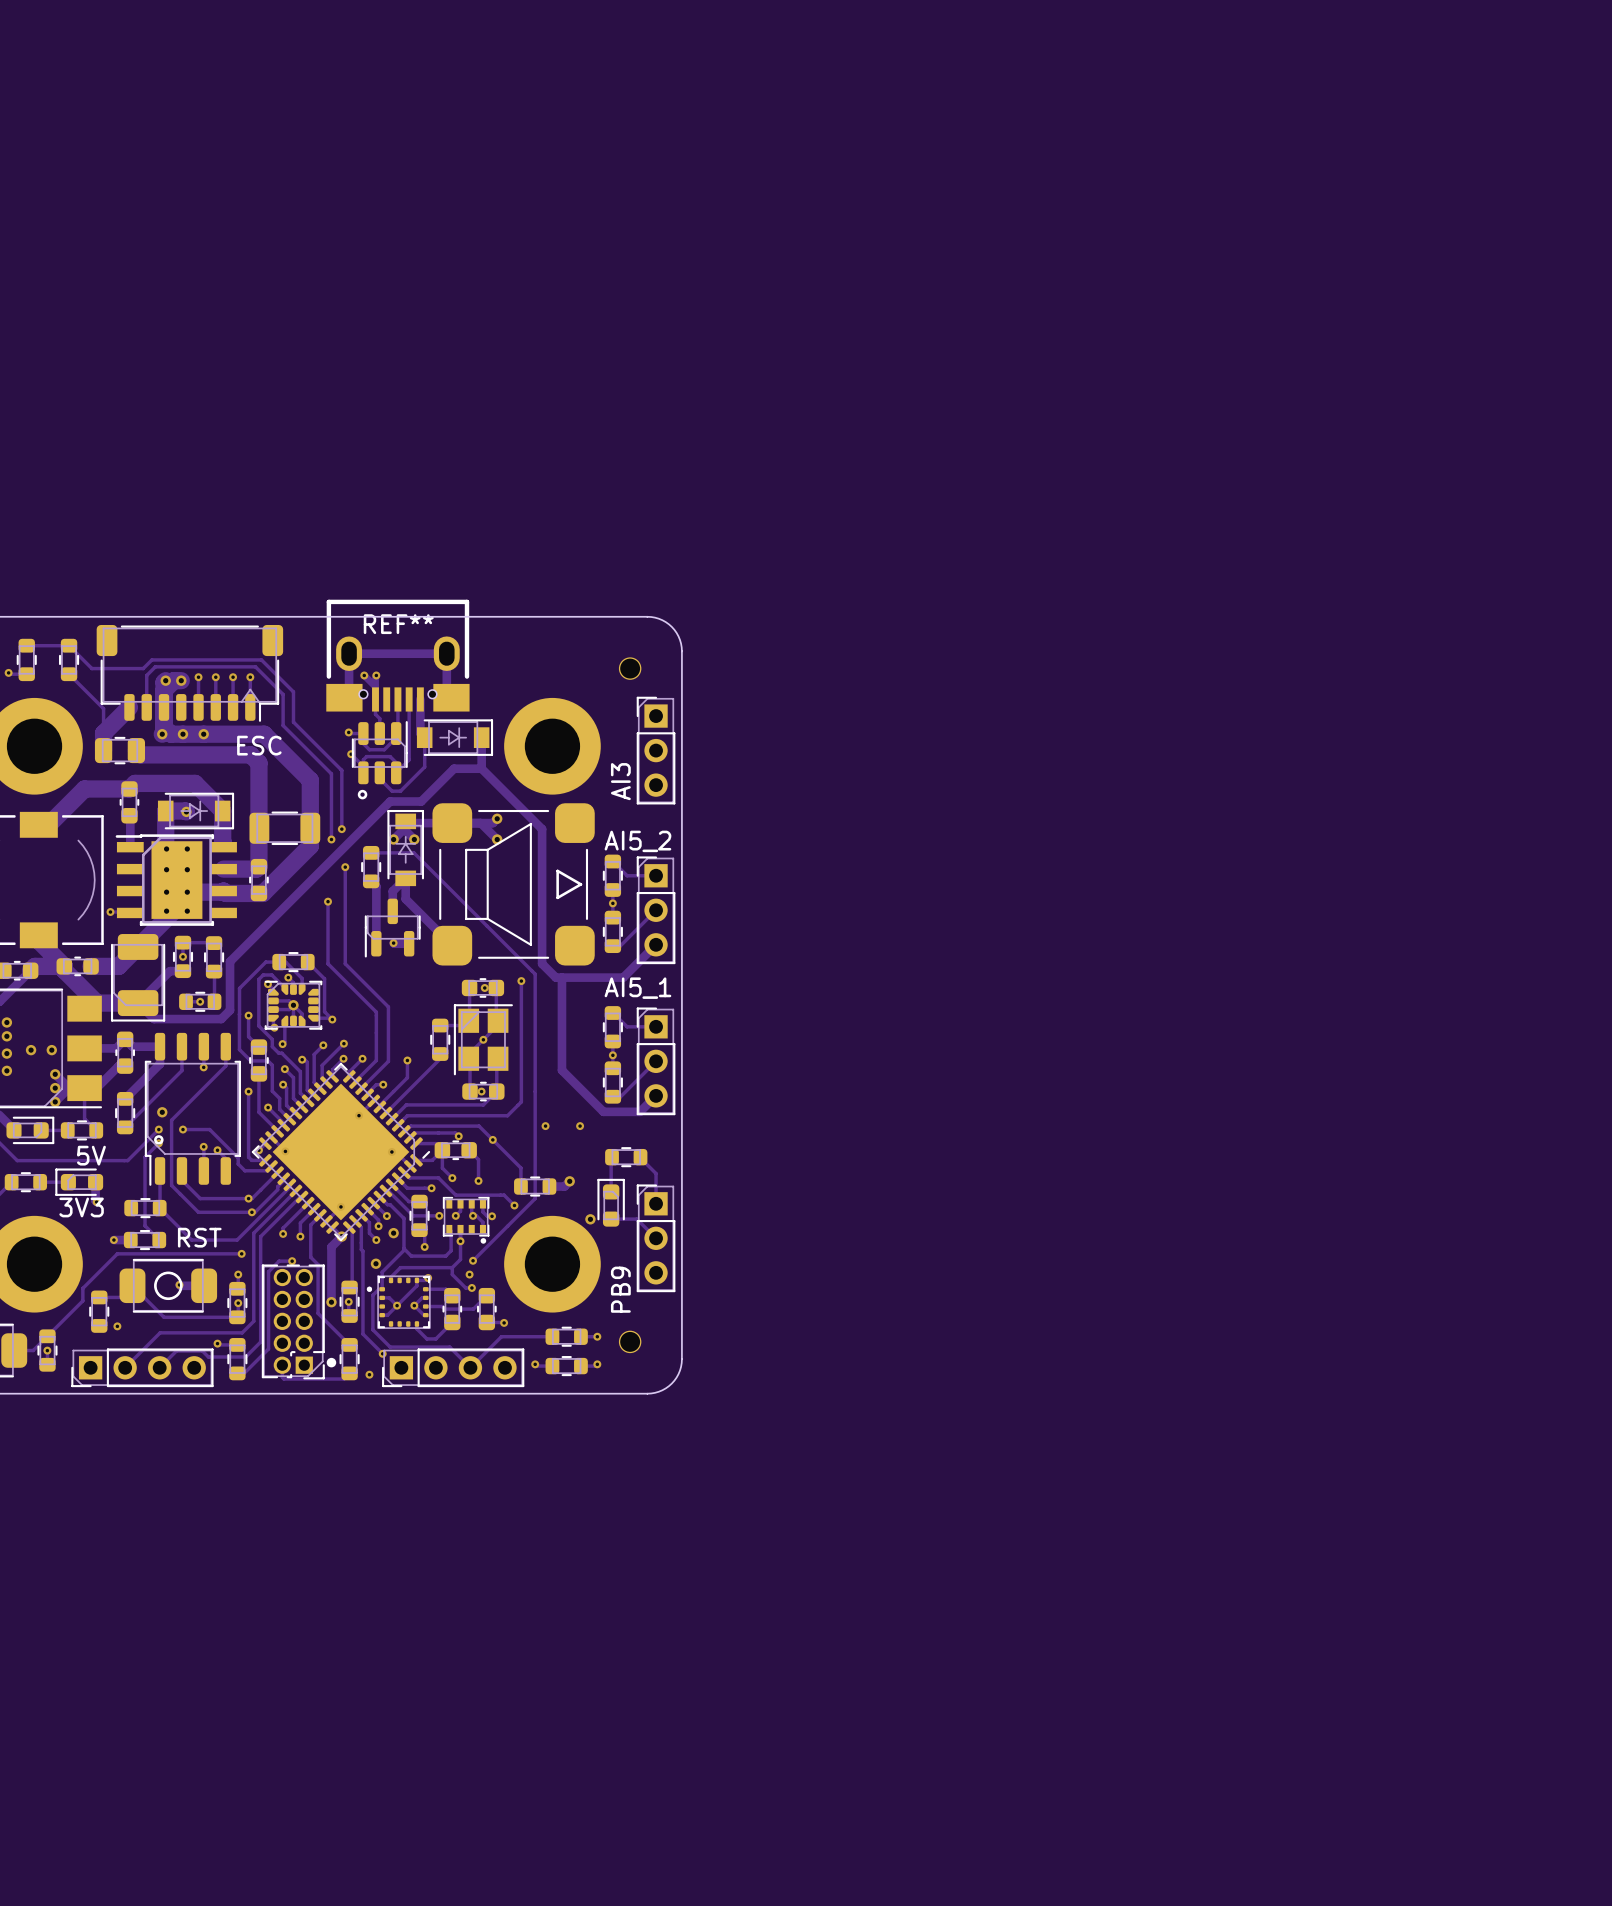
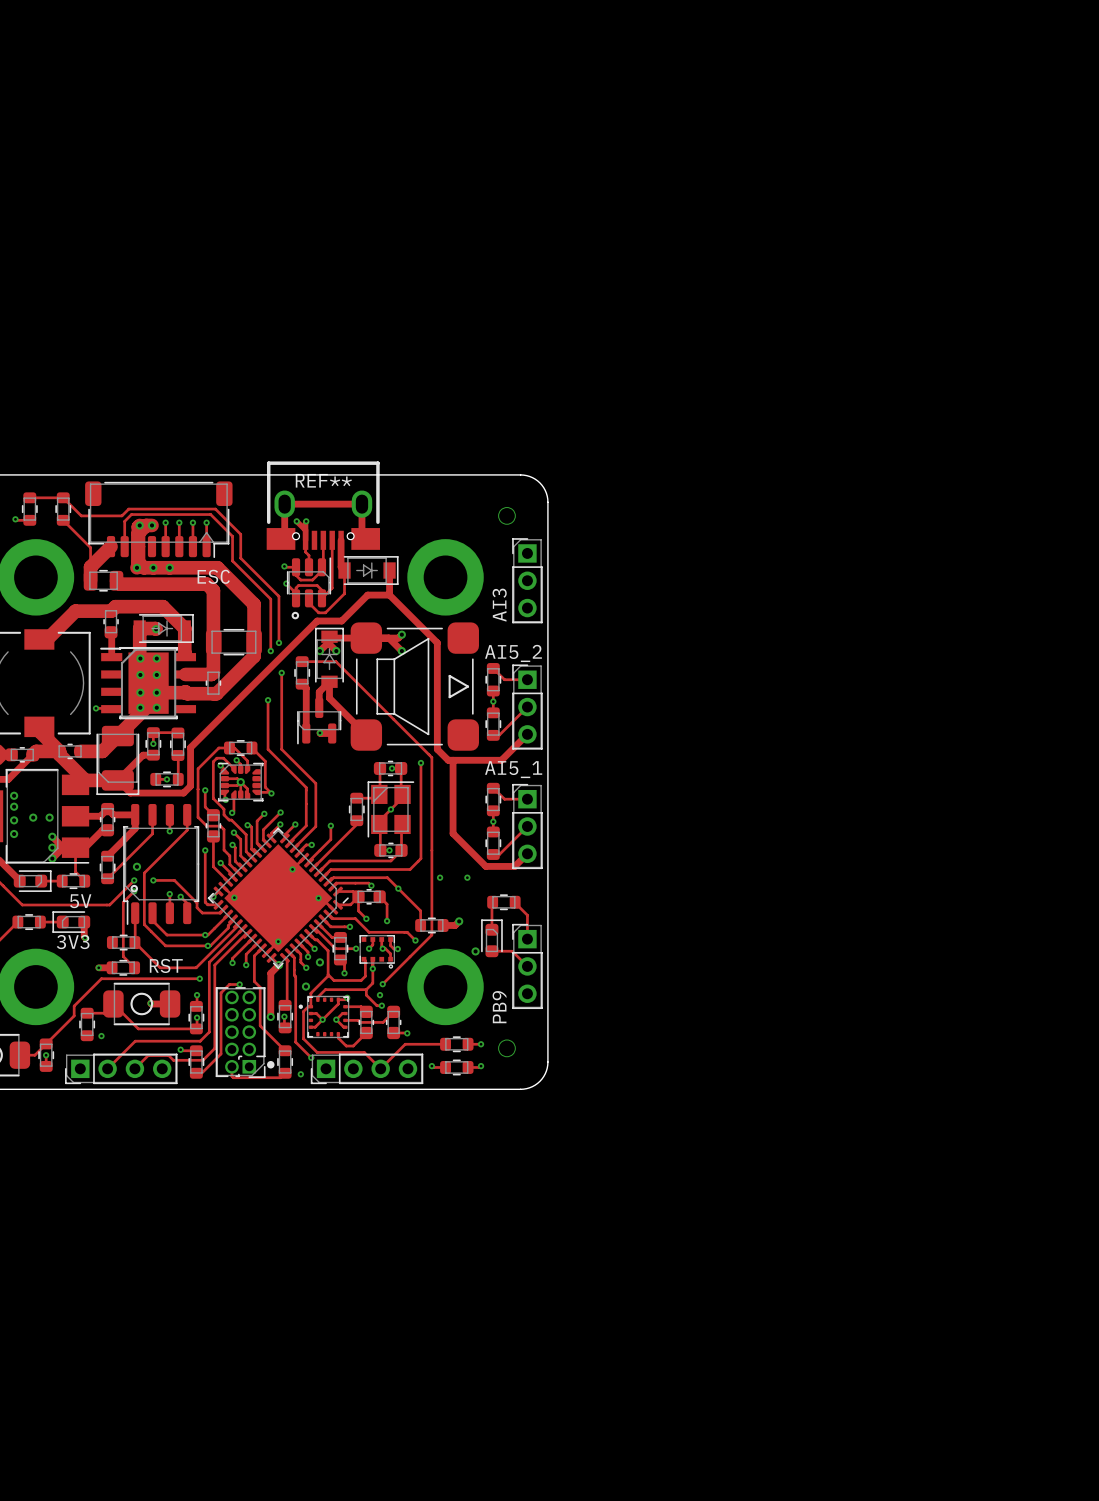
part footprint: [442, 1196, 490, 1244] -> [359, 935, 396, 969]

